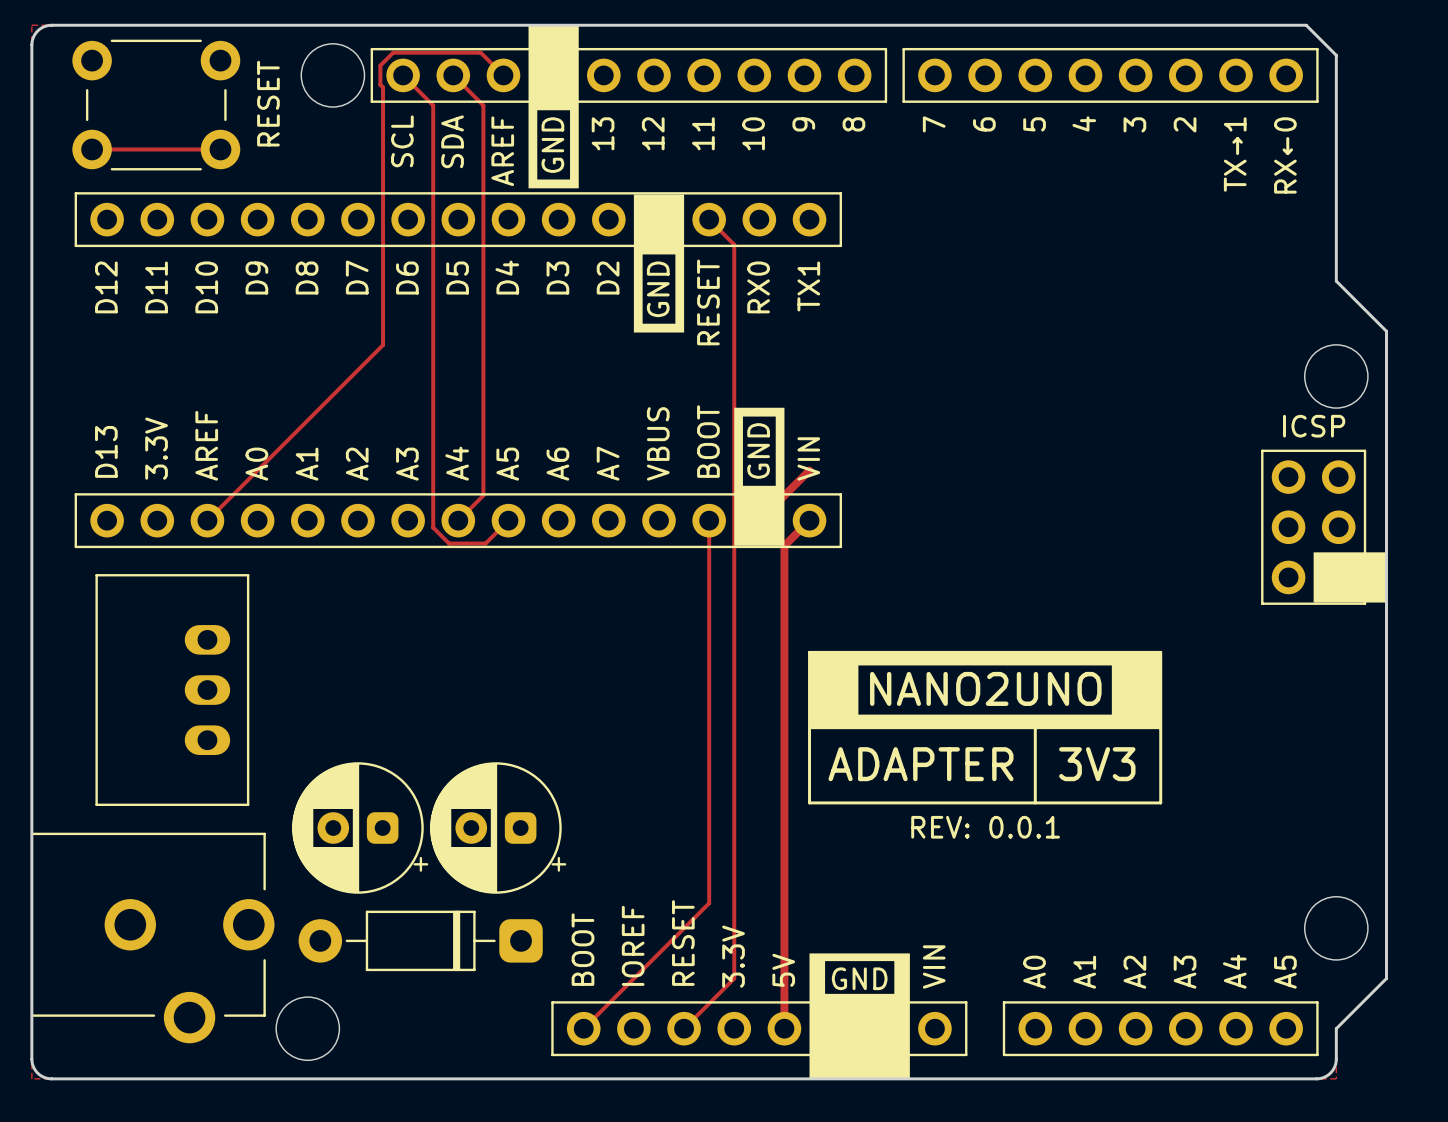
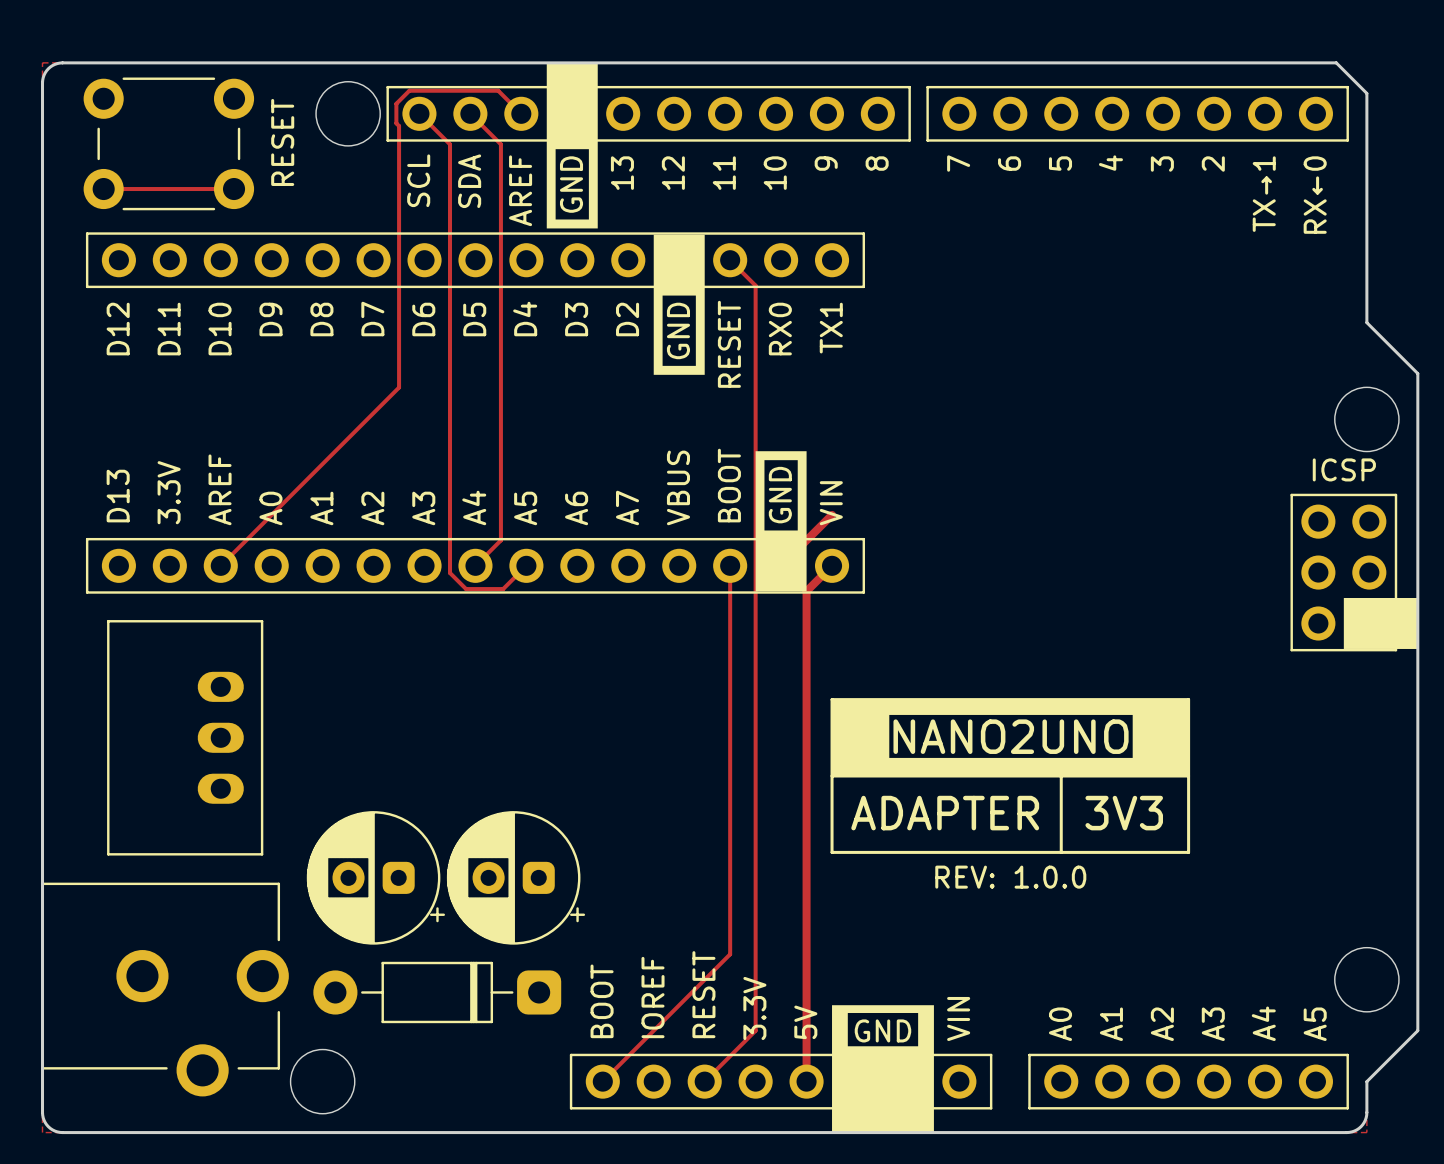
drawing shape: [809, 652, 1161, 728] -> [832, 699, 1189, 777]
text: REV: 0.0.1 (985, 827) -> REV: 1.0.0 (1010, 877)

